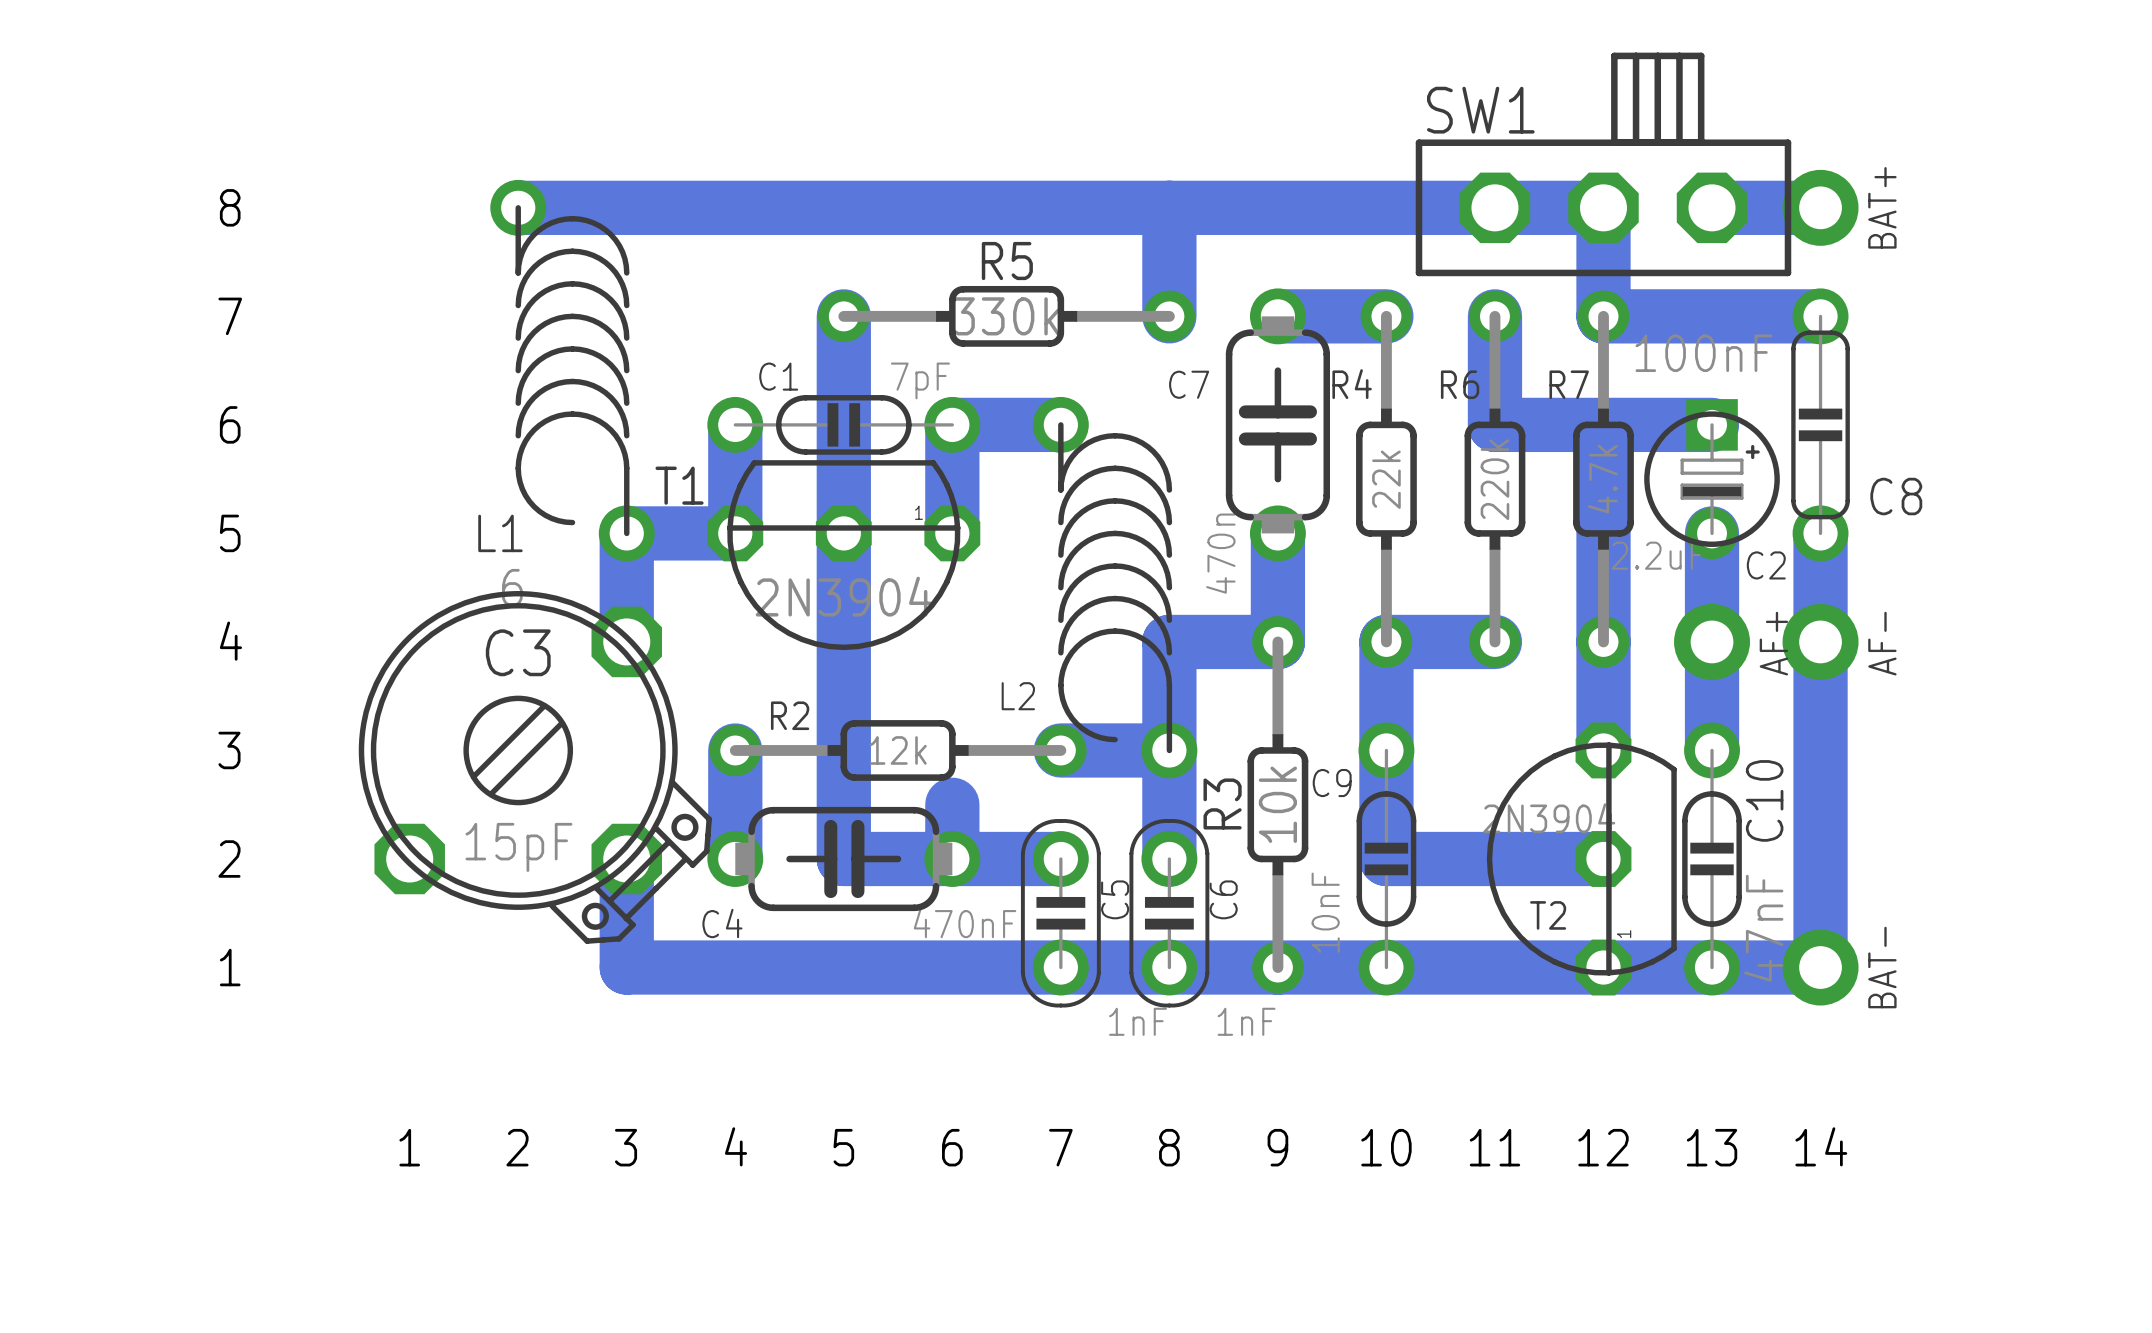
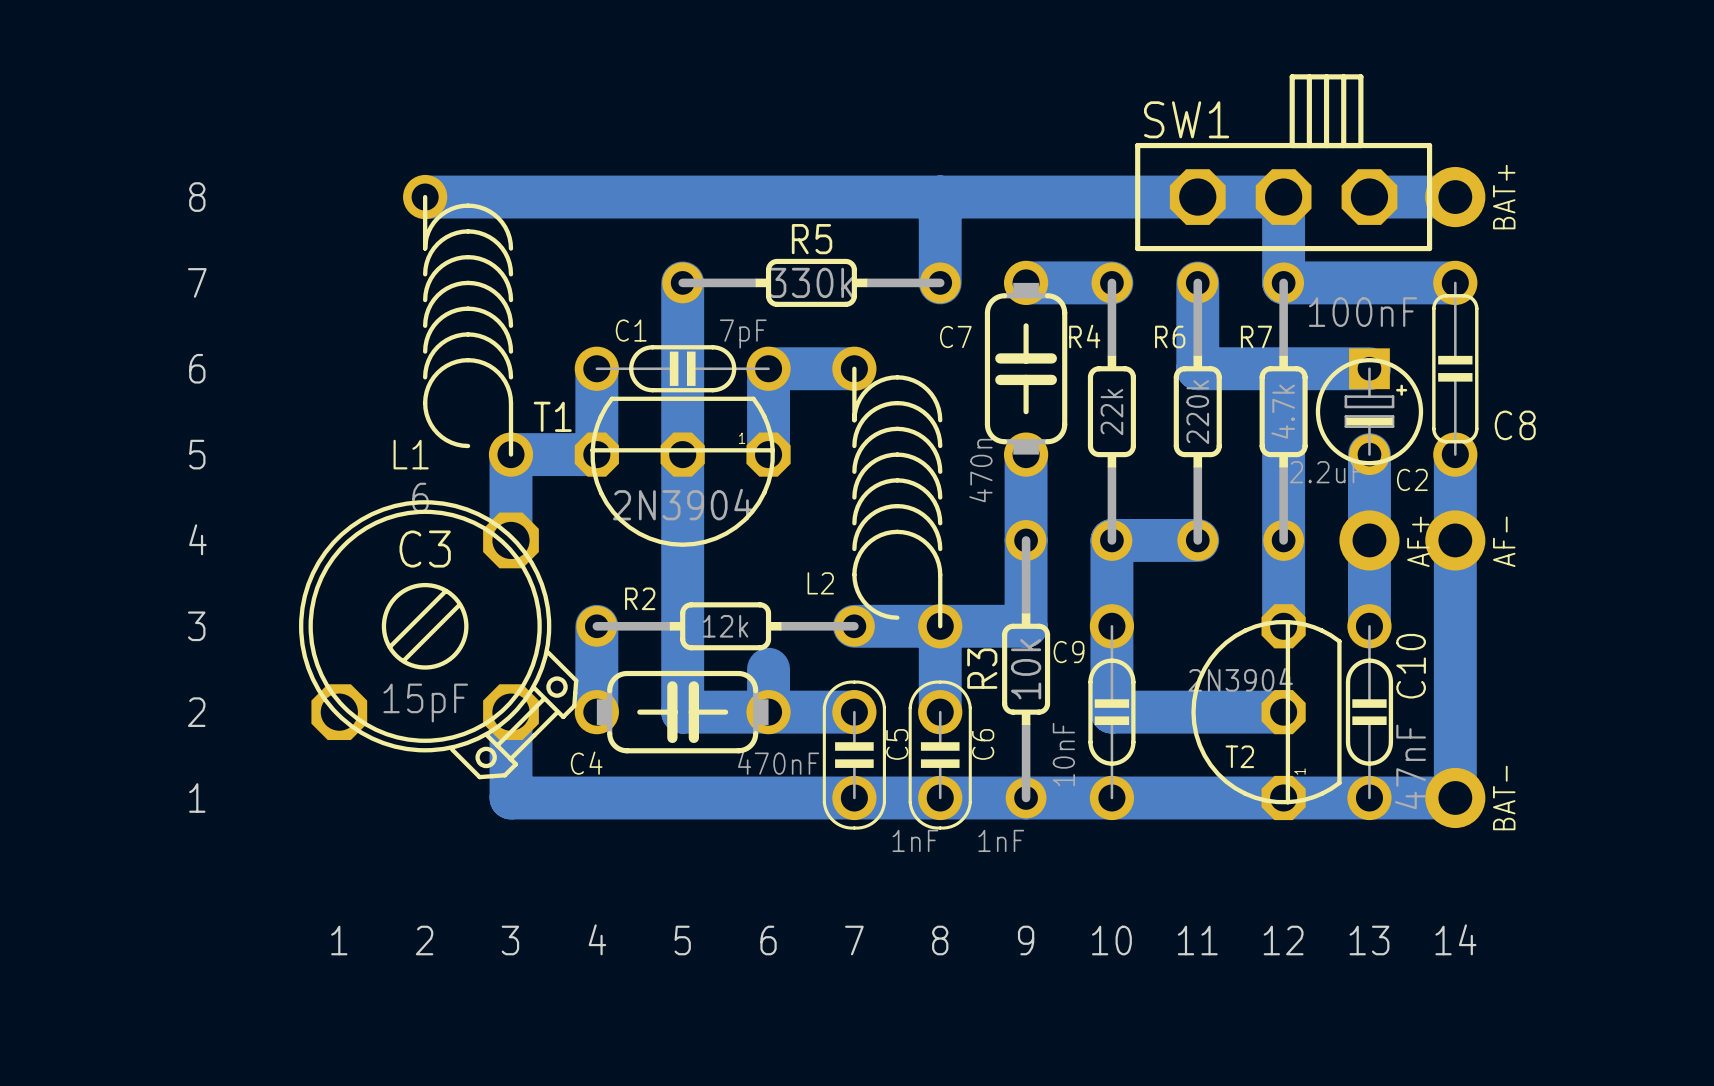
bottom track: (1277, 641) (1169, 641) (1169, 750) -> (1026, 540) (1026, 626) (940, 626)

